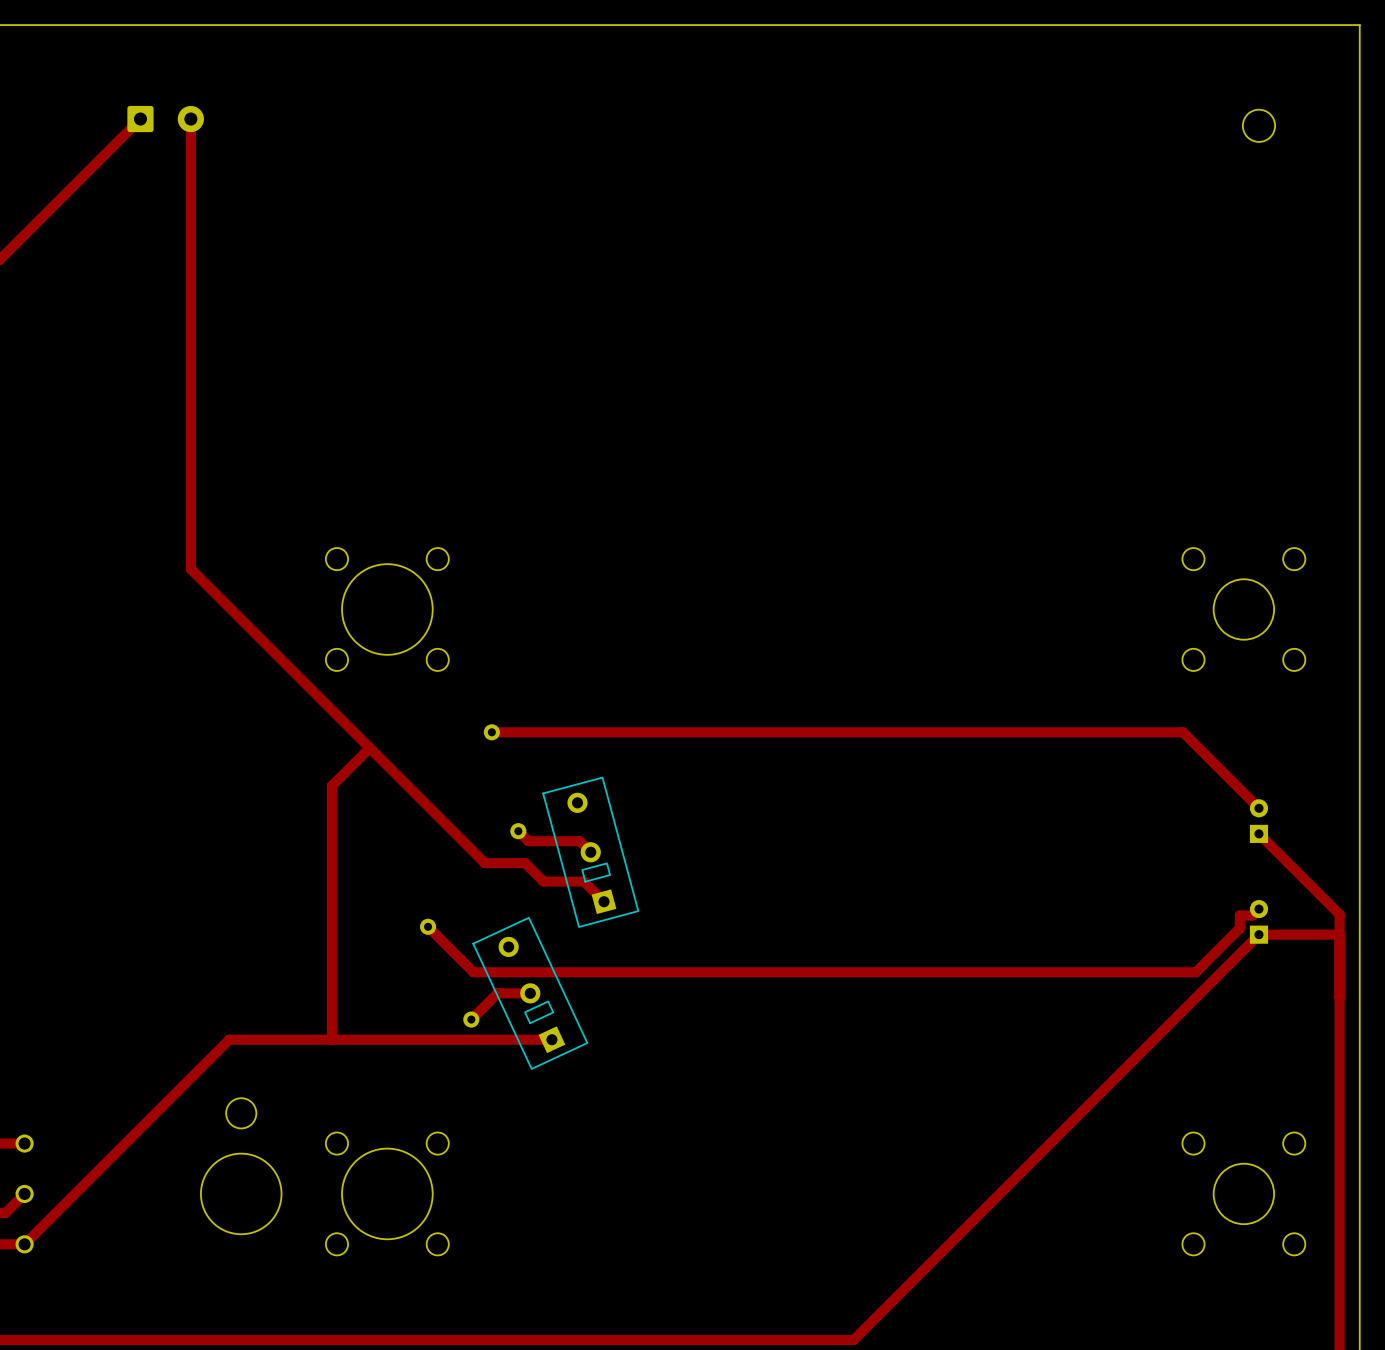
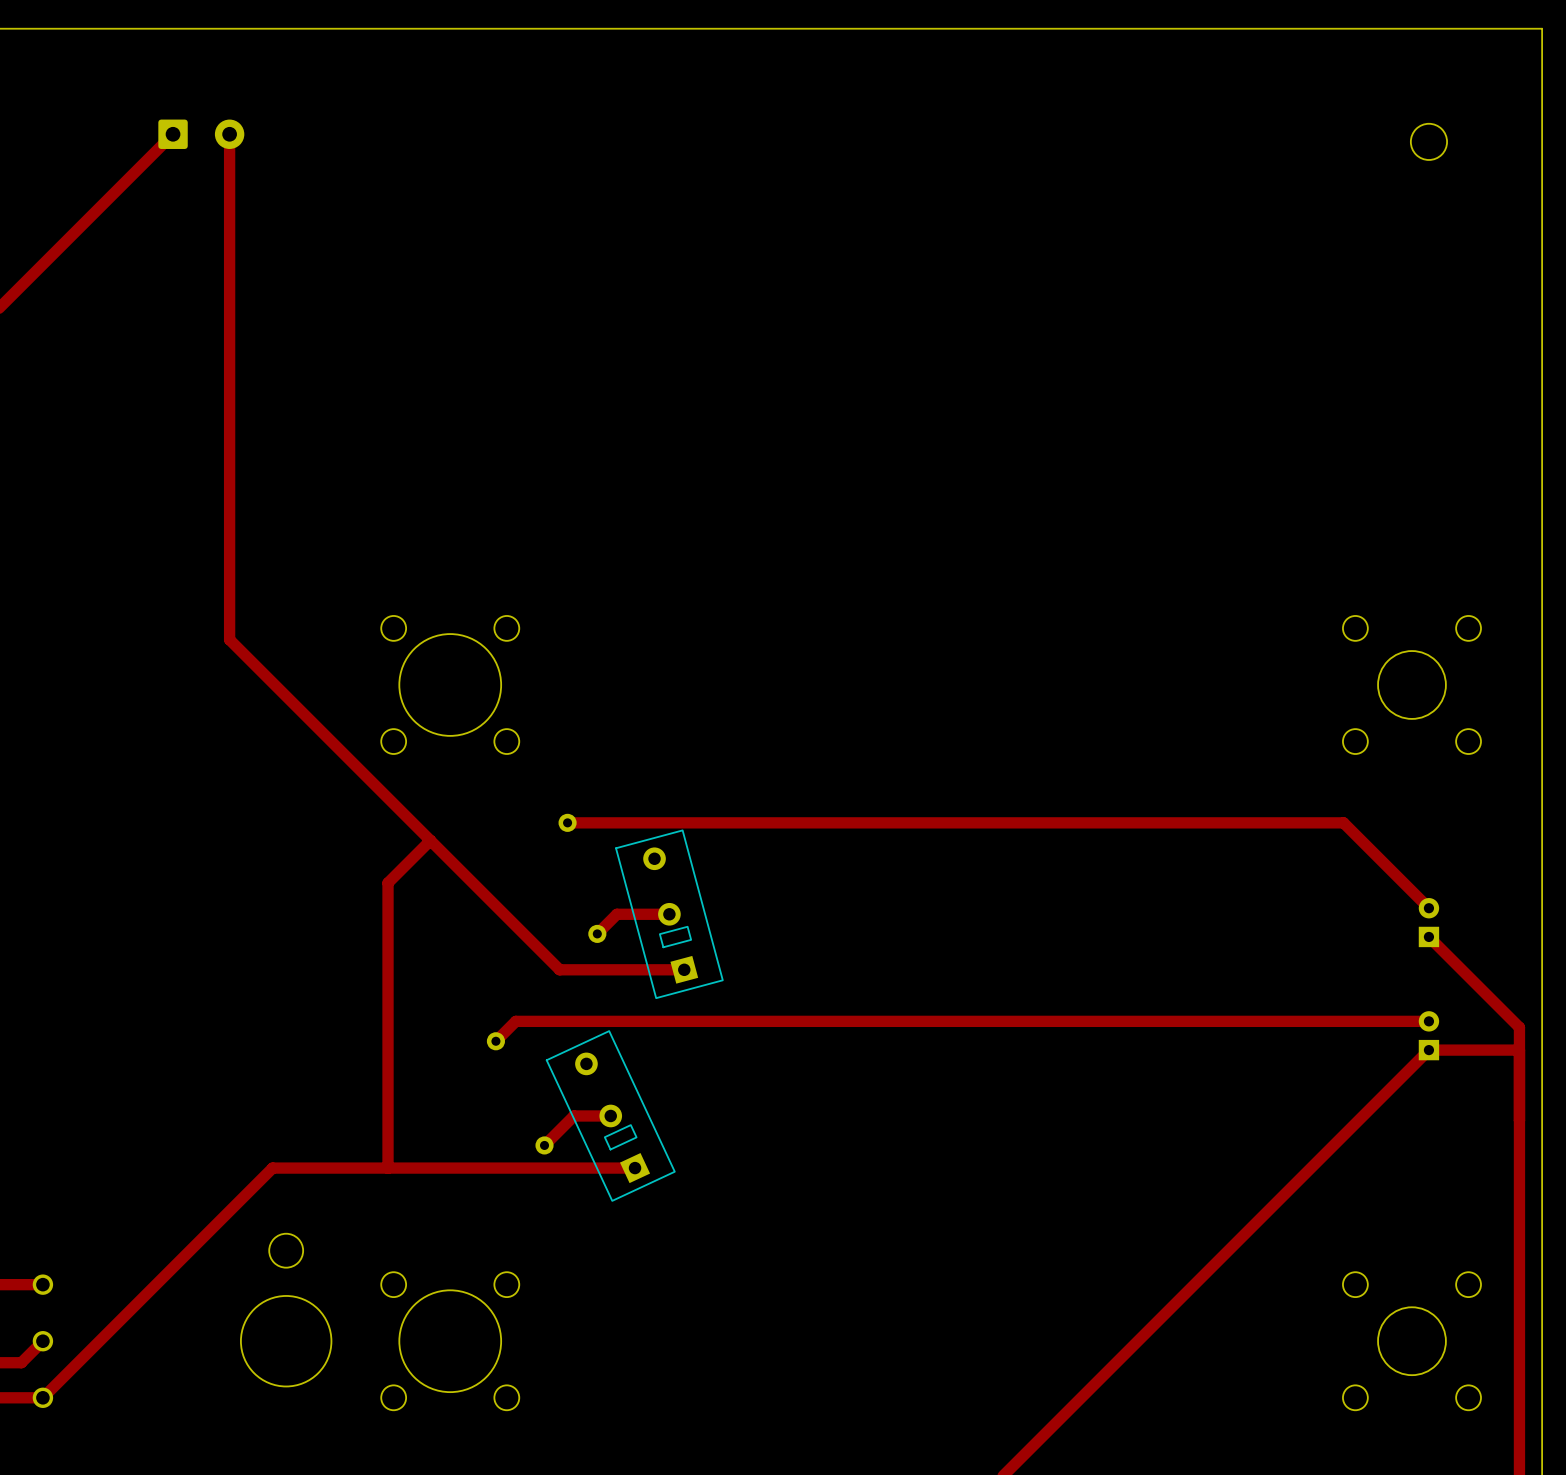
top track: (518, 831) (528, 841) (579, 841) (590, 852) -> (597, 933) (616, 914) (669, 914)
part position: (590, 852) -> (669, 914)
top track: (525, 863) (543, 881) (583, 881) (604, 901) -> (604, 969) (684, 969)
top track: (1258, 909) (1252, 915) (1239, 915) (1239, 928) (1195, 972) (473, 972) (428, 926) -> (1428, 1021) (515, 1021) (495, 1041)

